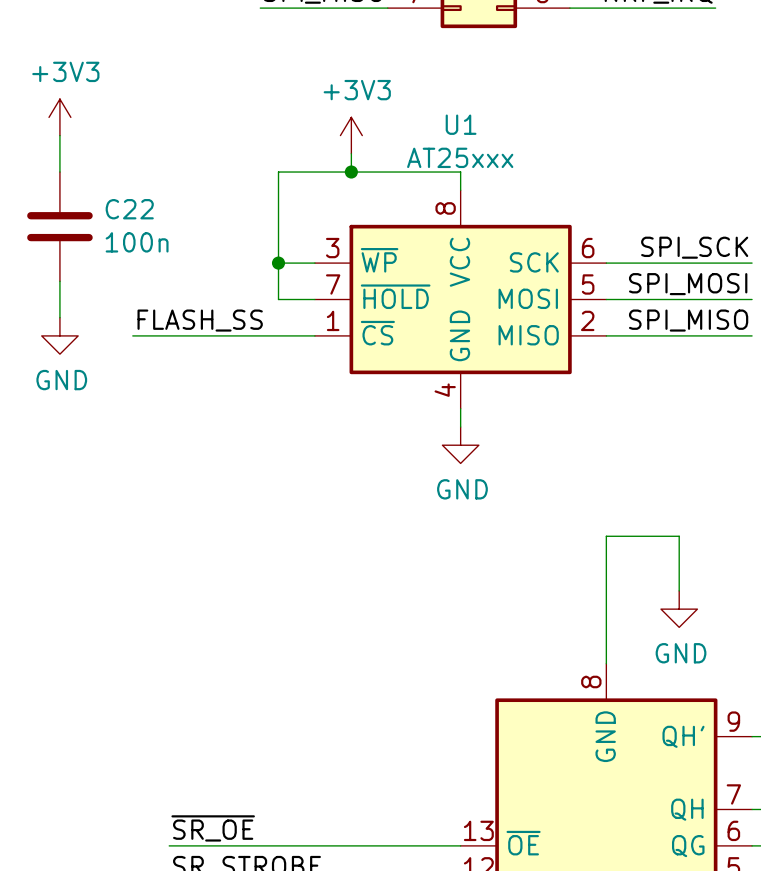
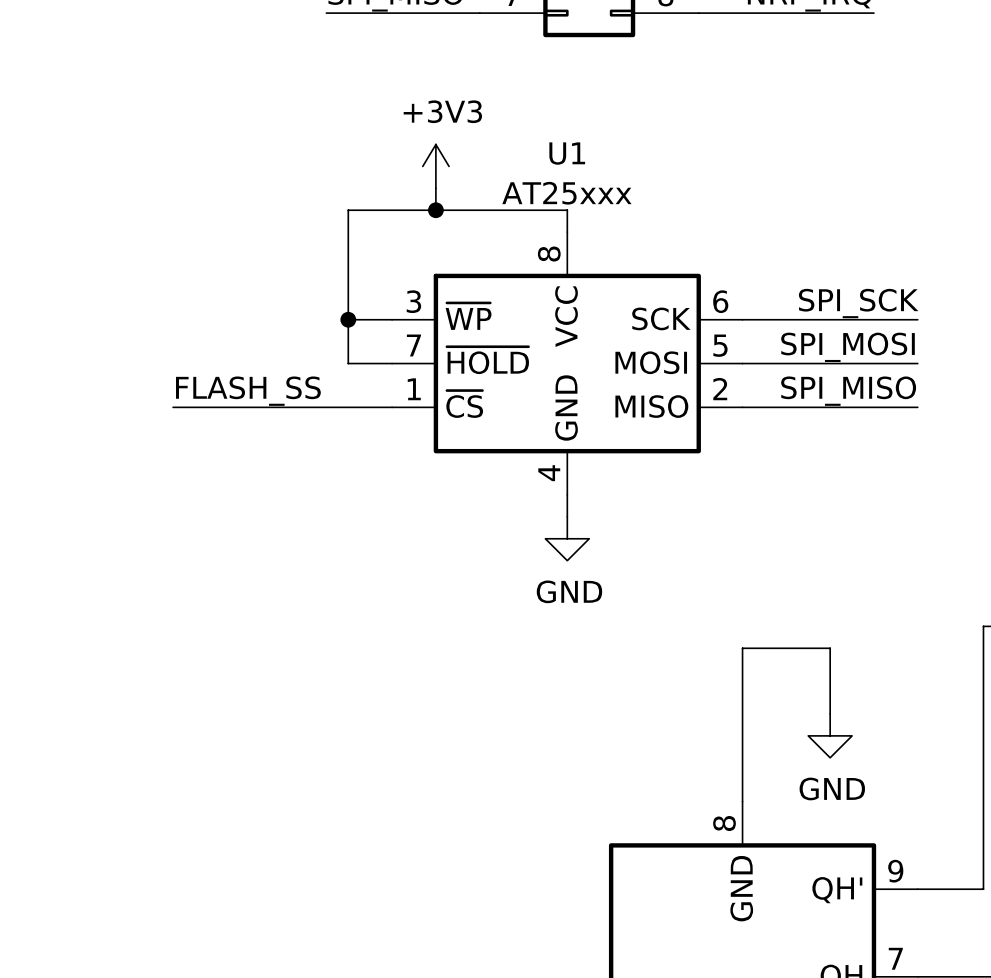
power symbol: +3V3 (59, 117) -> none
wire: (59, 135) (59, 172) -> none
C22: 100n (59, 226) -> none
wire: (59, 281) (59, 317) -> none
power symbol: GND (59, 335) -> none

